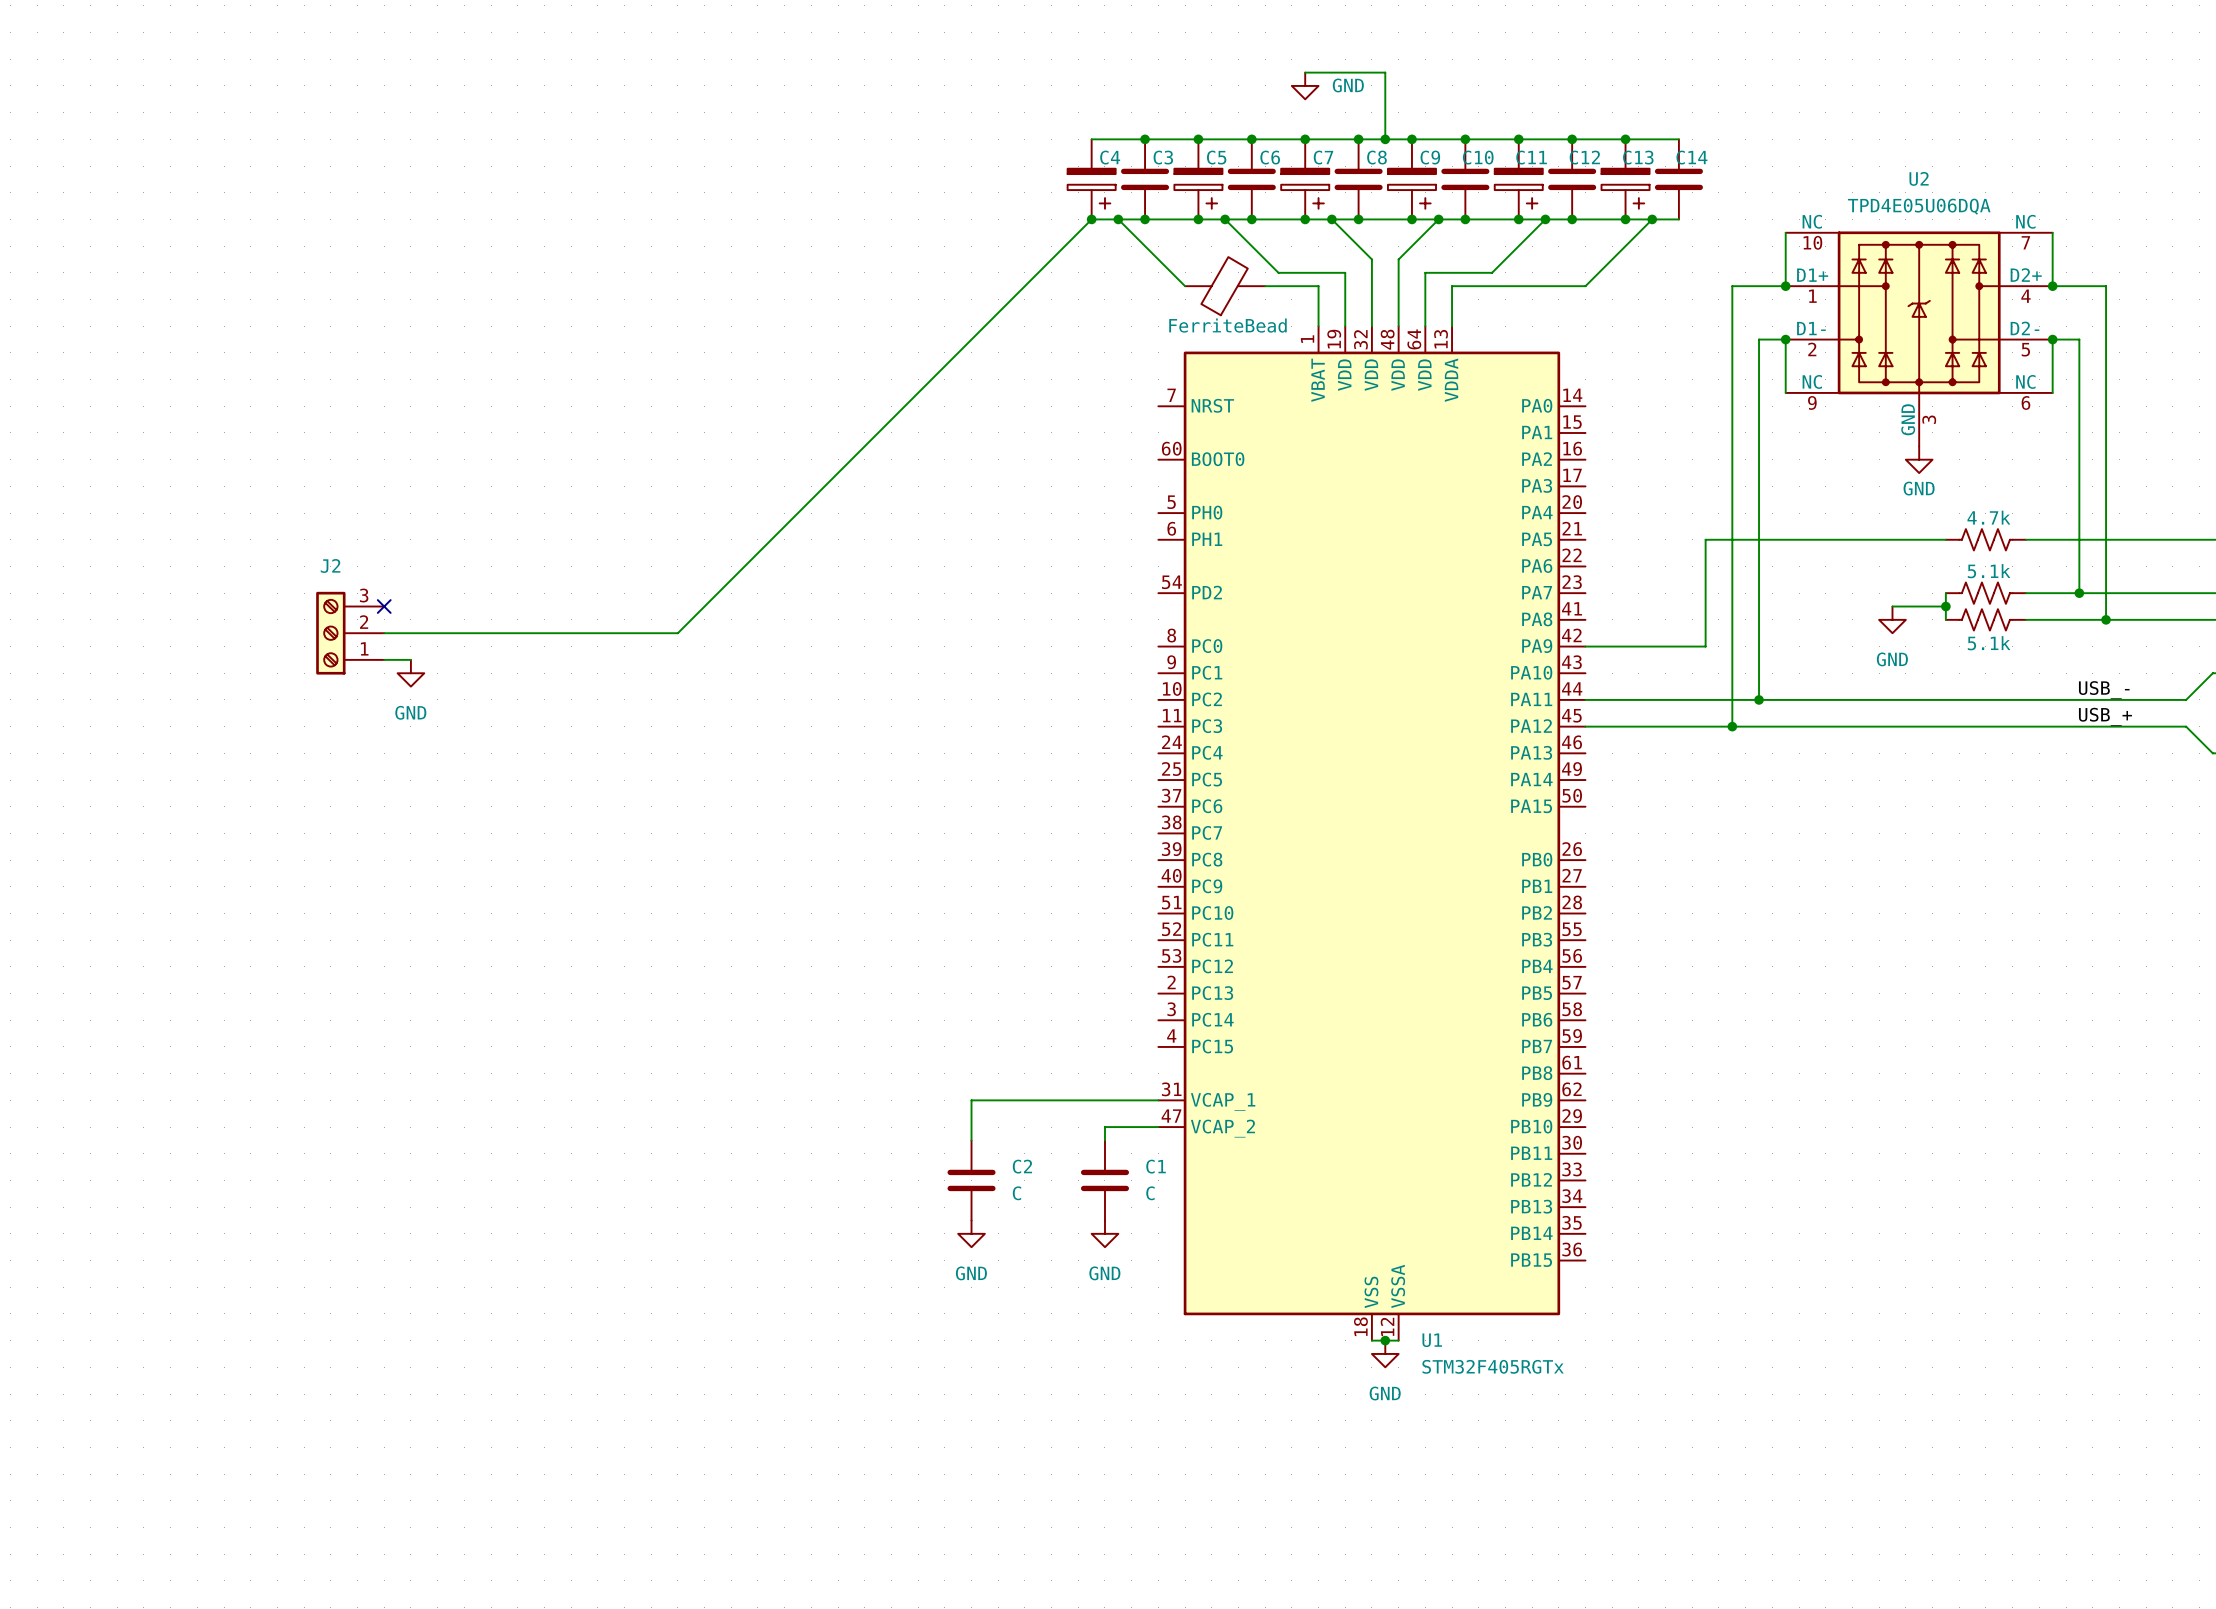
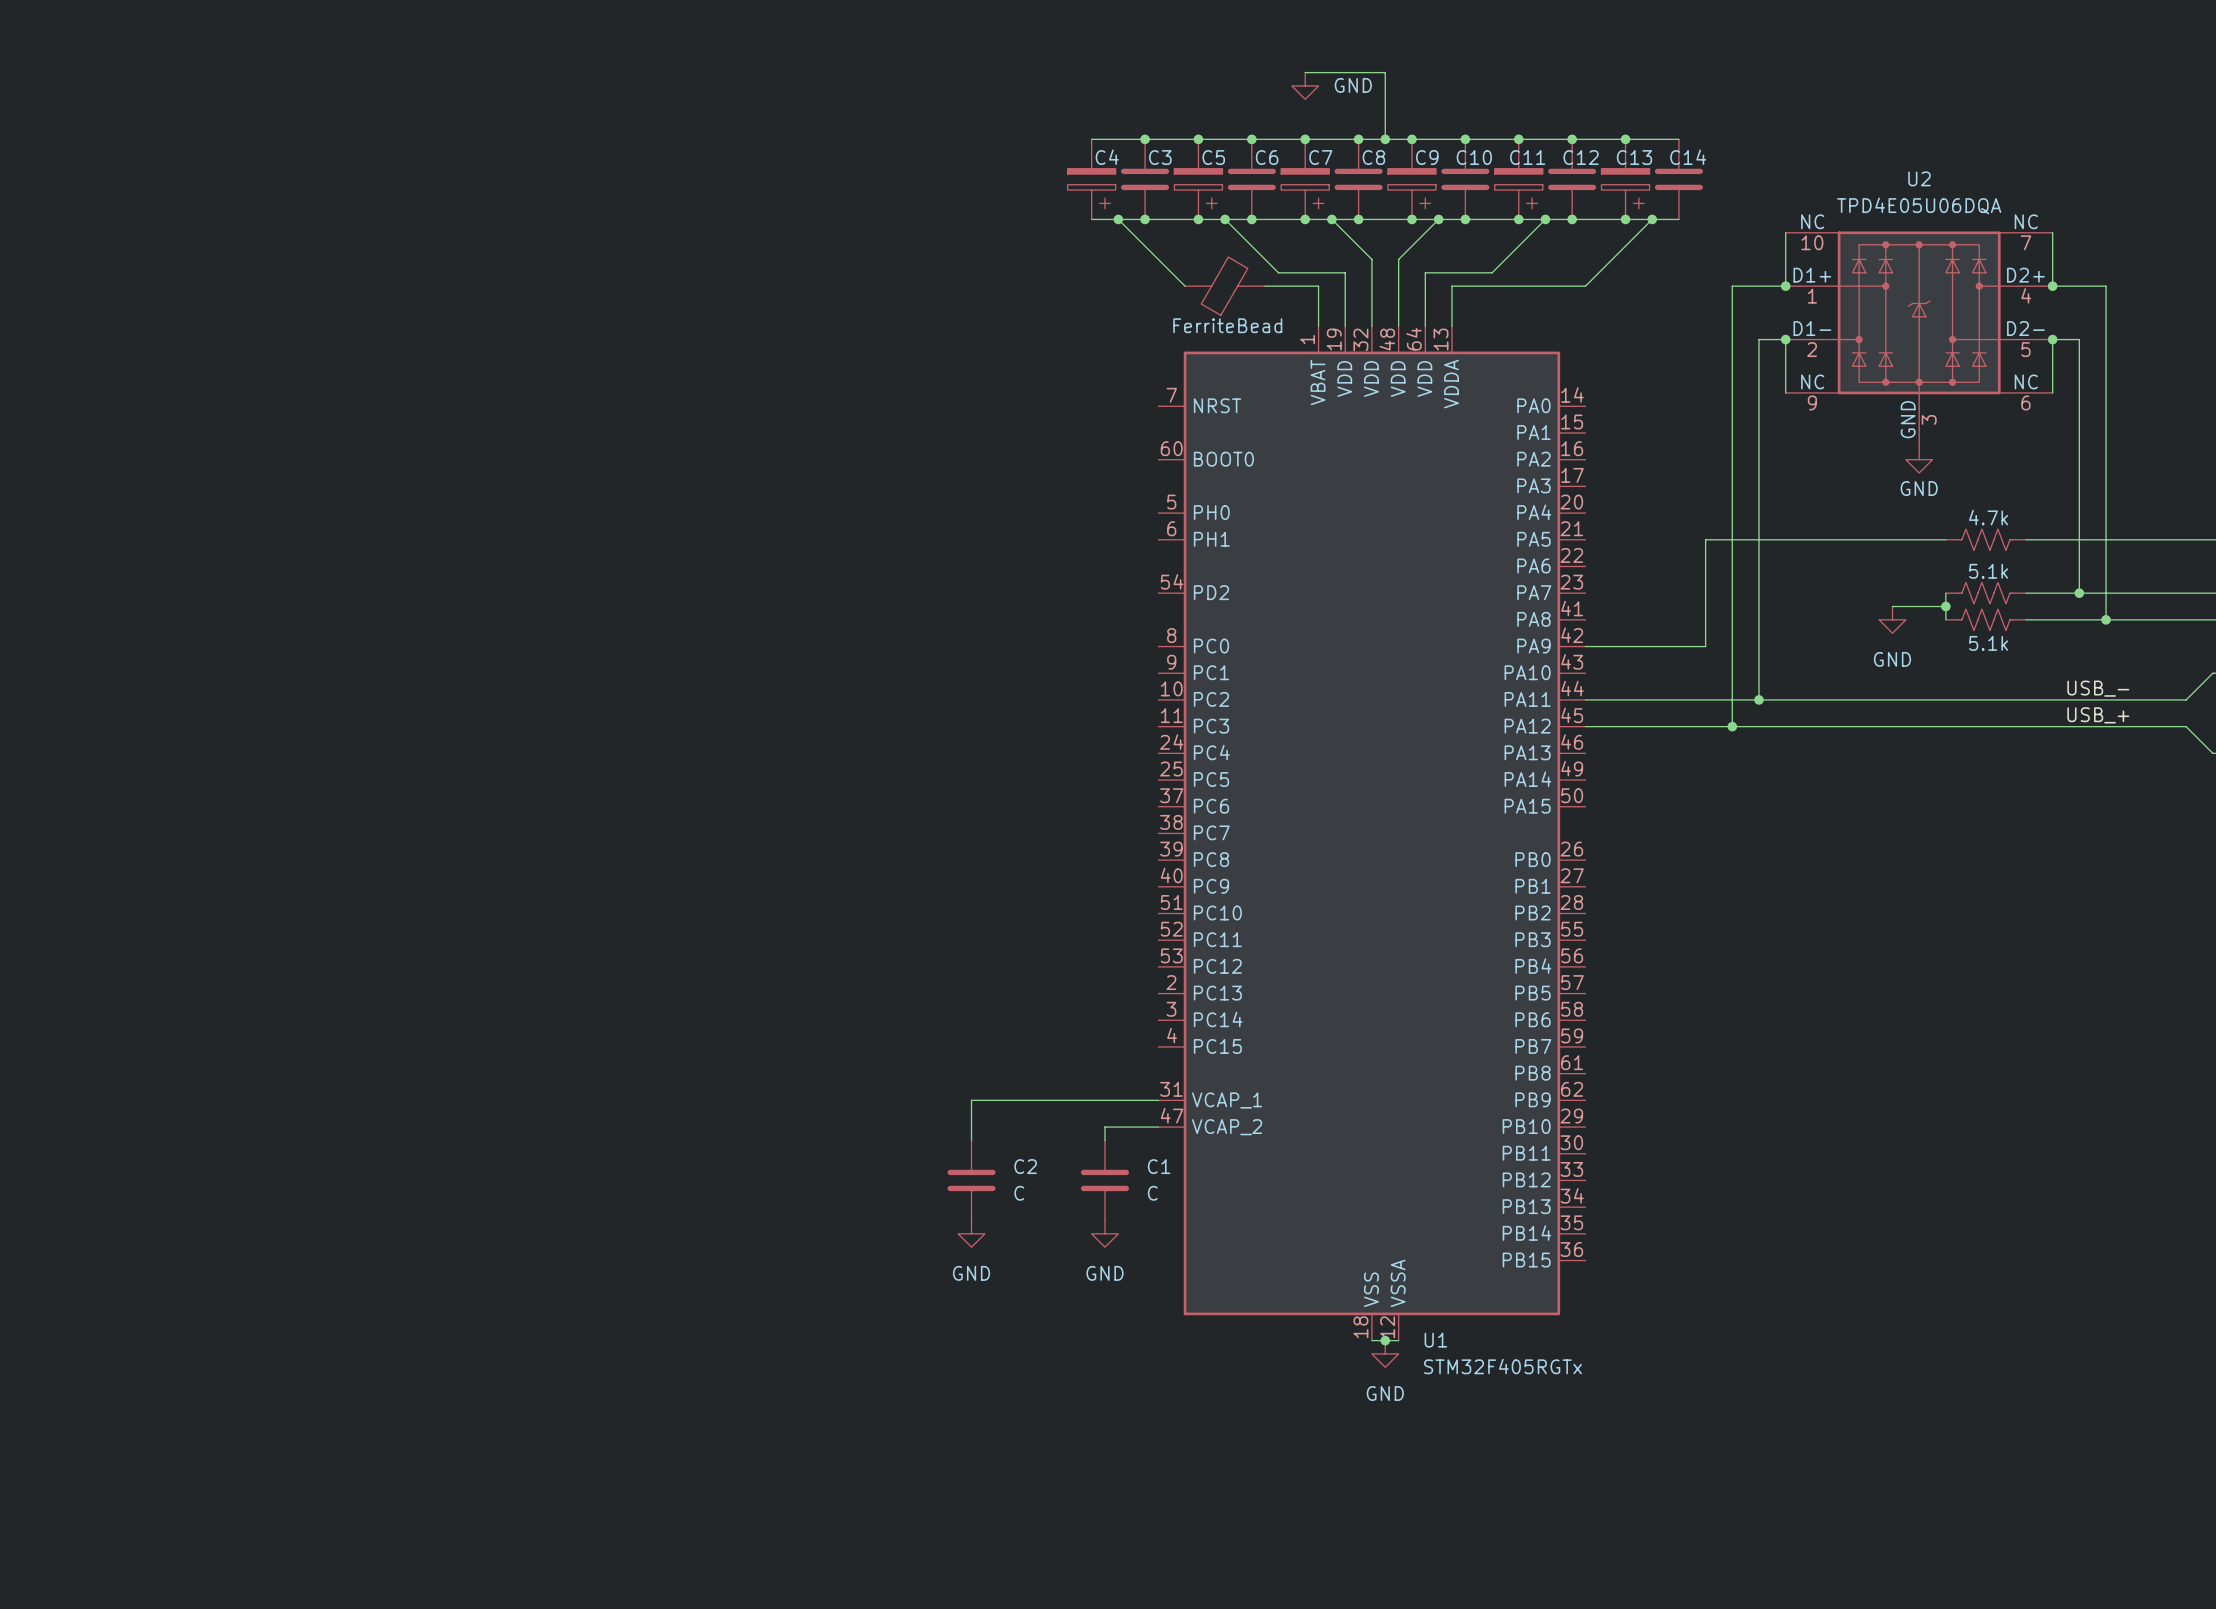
wire: (1091, 219) (677, 633) (384, 633) -> none
junction: (1091, 219) -> none
no-connect mark: (384, 606) -> none
J2: (350, 633) -> none
wire: (384, 659) (410, 659) -> none
power symbol: GND (410, 673) -> none

